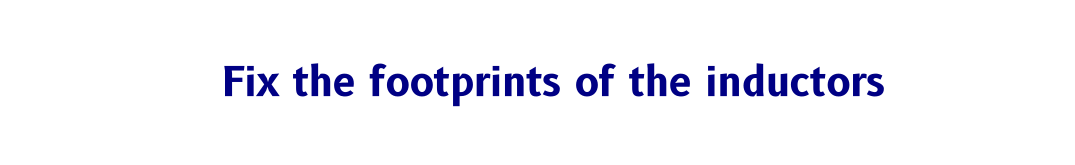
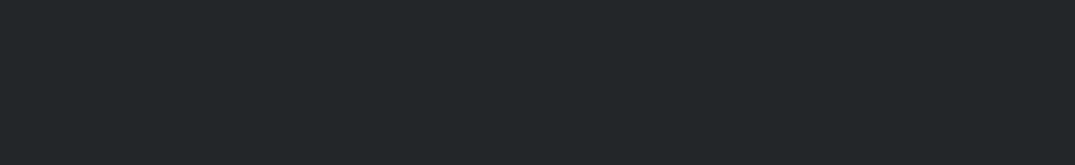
text: Fix the footprints of the inductors (554, 84) -> none

